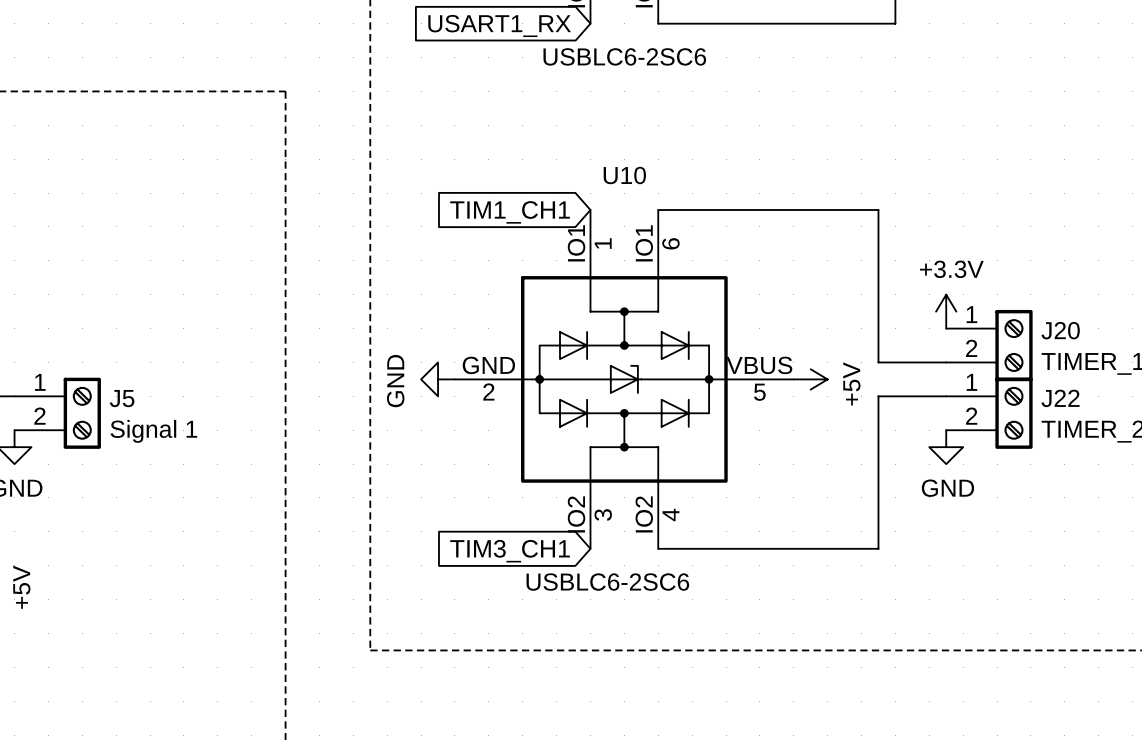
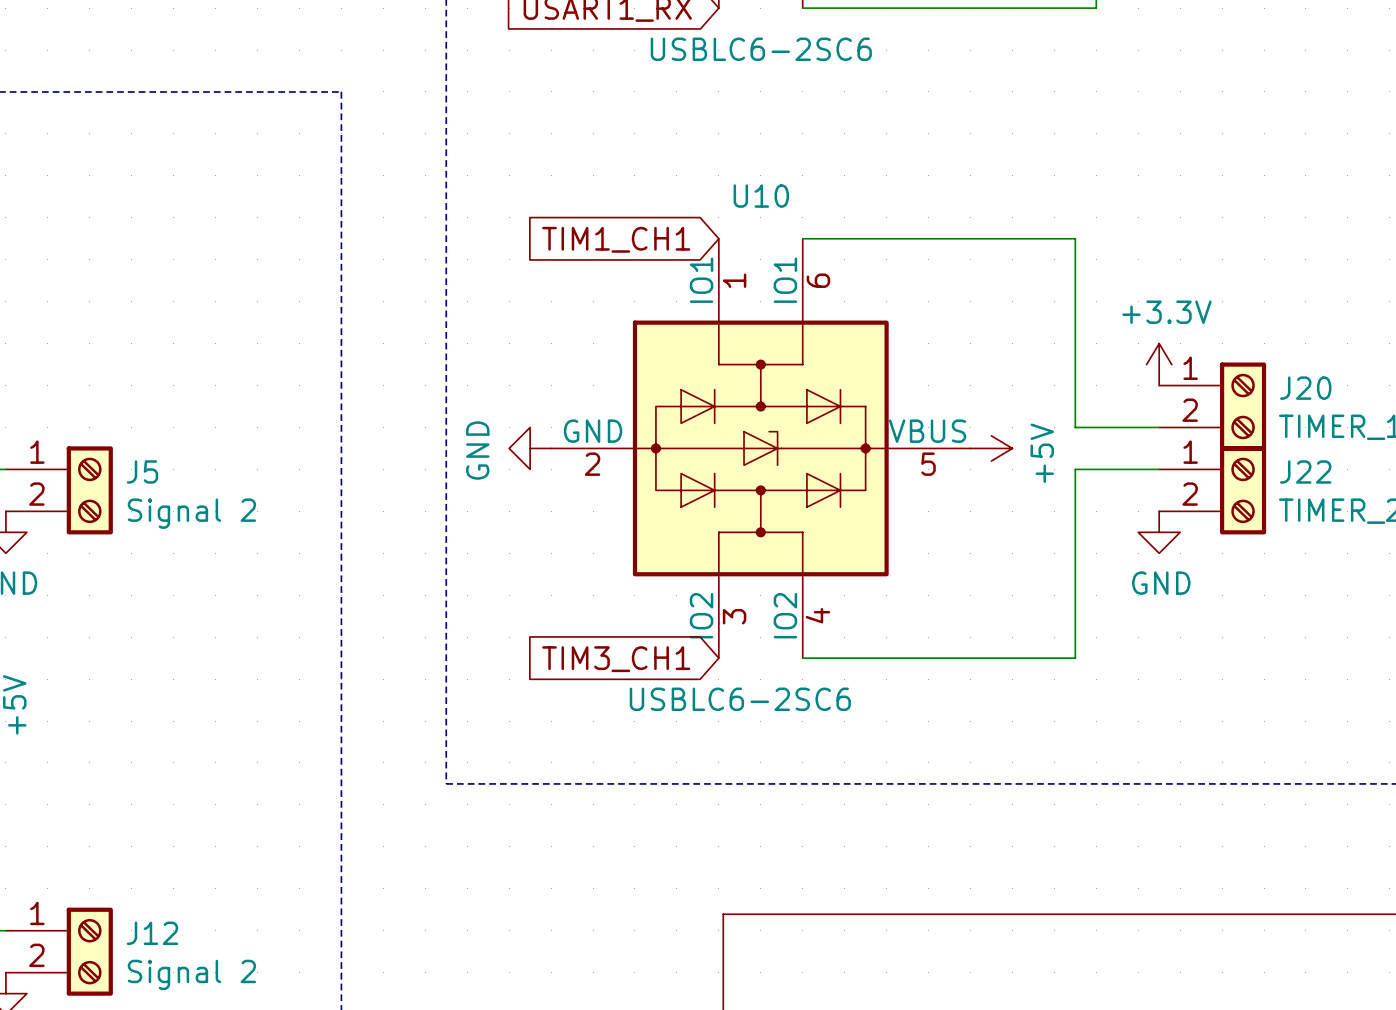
J5 value: Signal 1 (153, 431) -> Signal 2 (191, 513)

